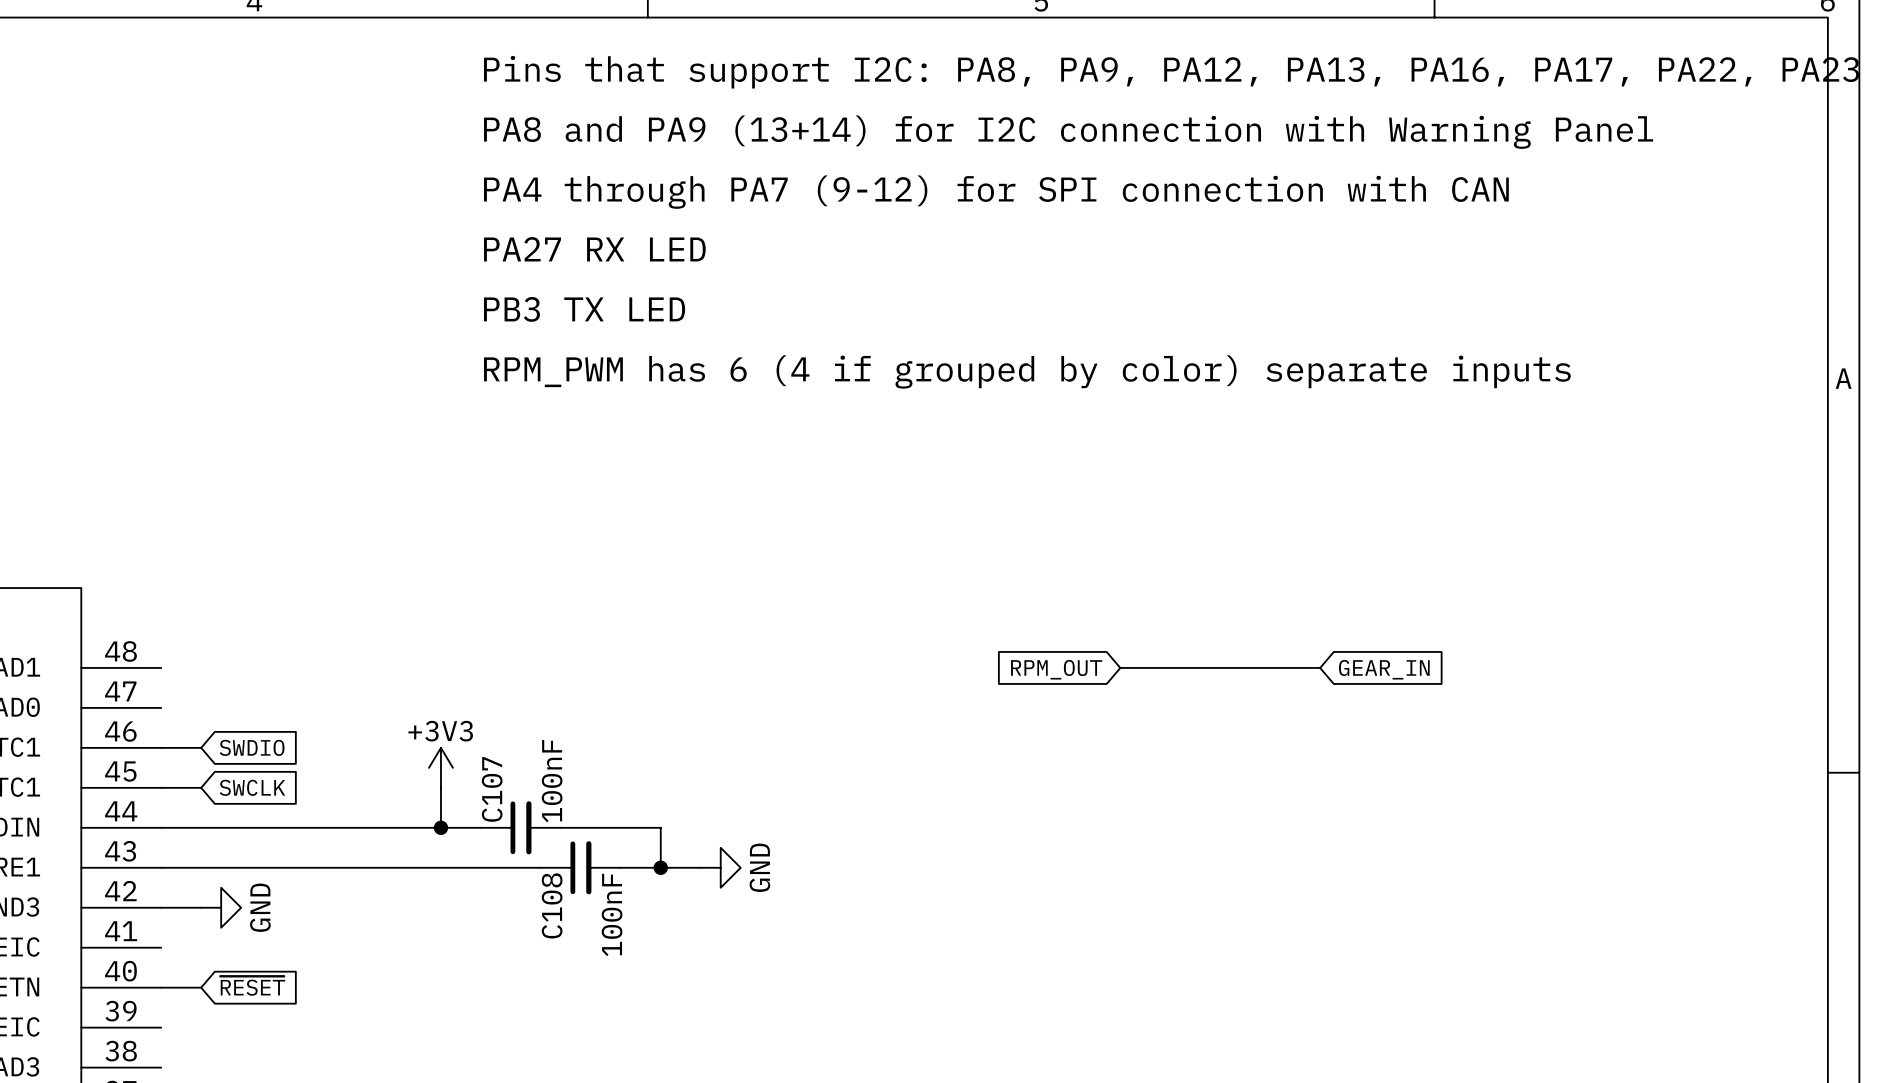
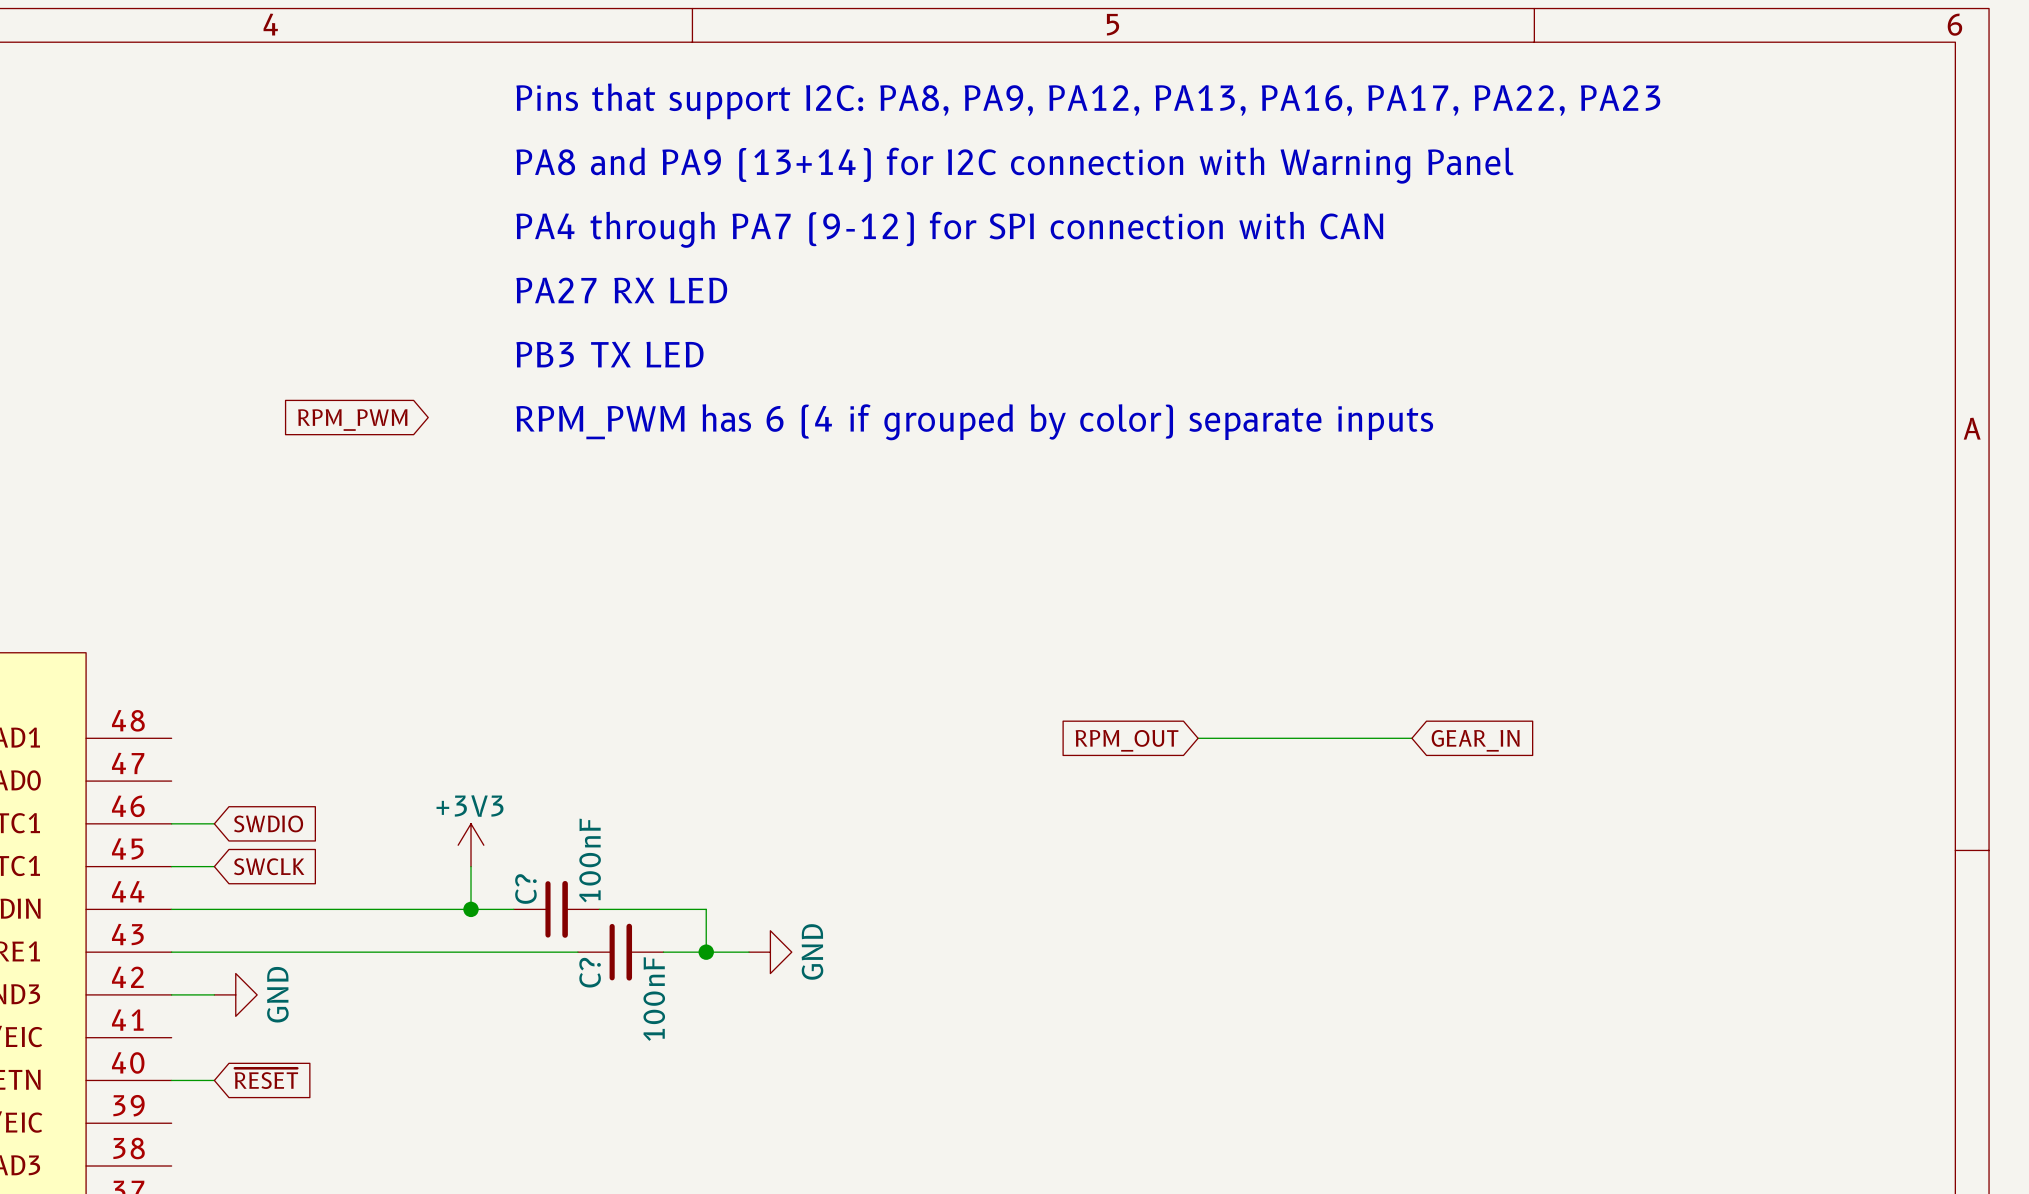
global label: none -> RPM_PWM (352, 420)
C107 name: C107 (492, 789) -> C? (525, 889)
C108 name: C108 (552, 905) -> C? (590, 972)

